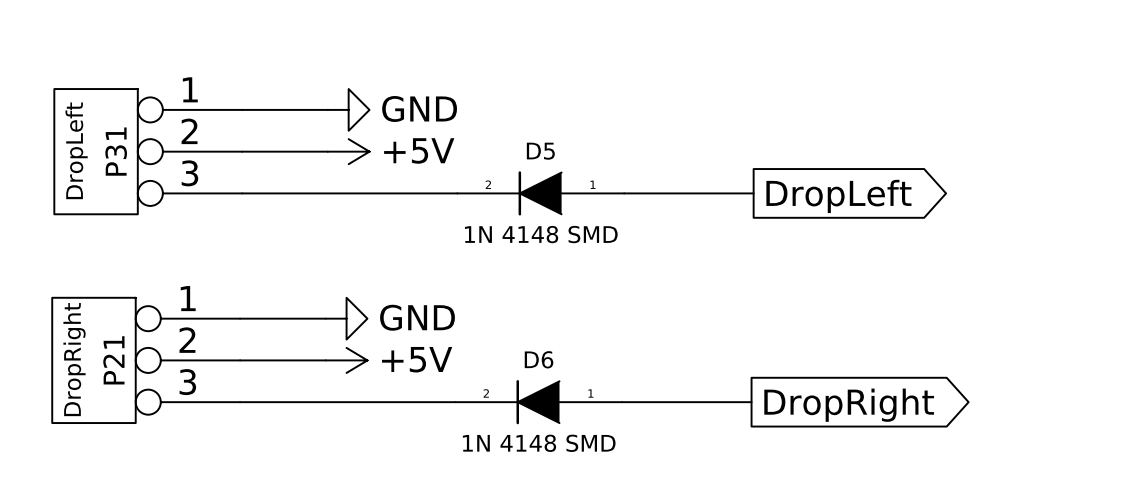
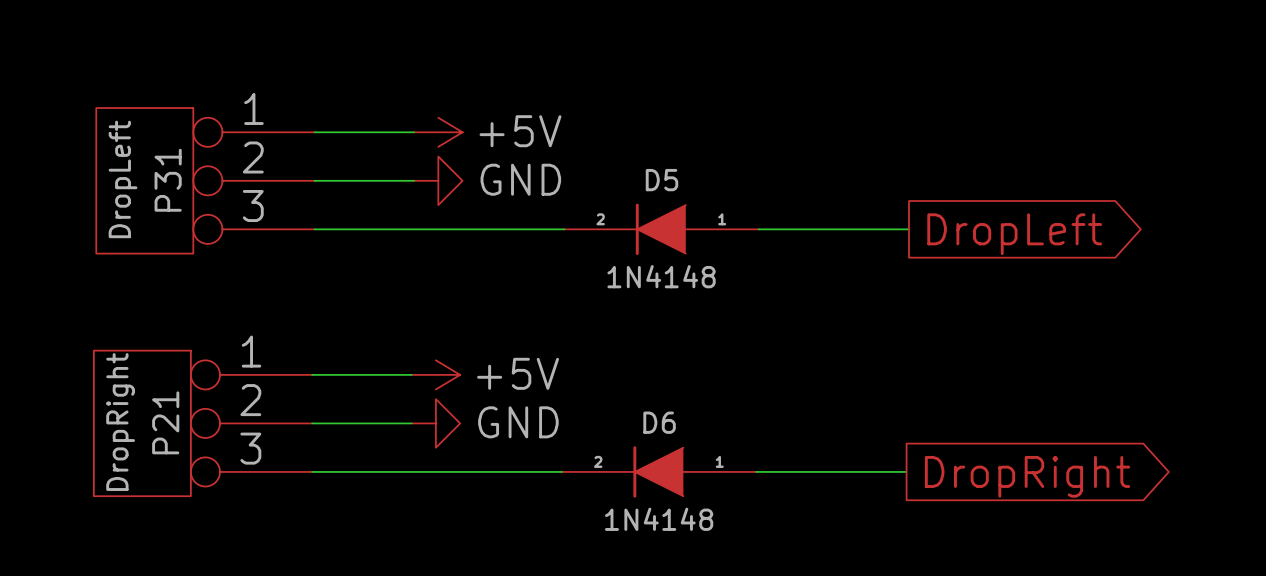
power symbol: GND (348, 109) -> +5V (438, 132)
power symbol: +5V (348, 151) -> GND (438, 180)
D5 value: 1N 4148 SMD (541, 234) -> 1N4148 (661, 276)
power symbol: GND (346, 318) -> +5V (435, 374)
power symbol: +5V (346, 360) -> GND (435, 423)
D6 value: 1N 4148 SMD (539, 443) -> 1N4148 (659, 519)

